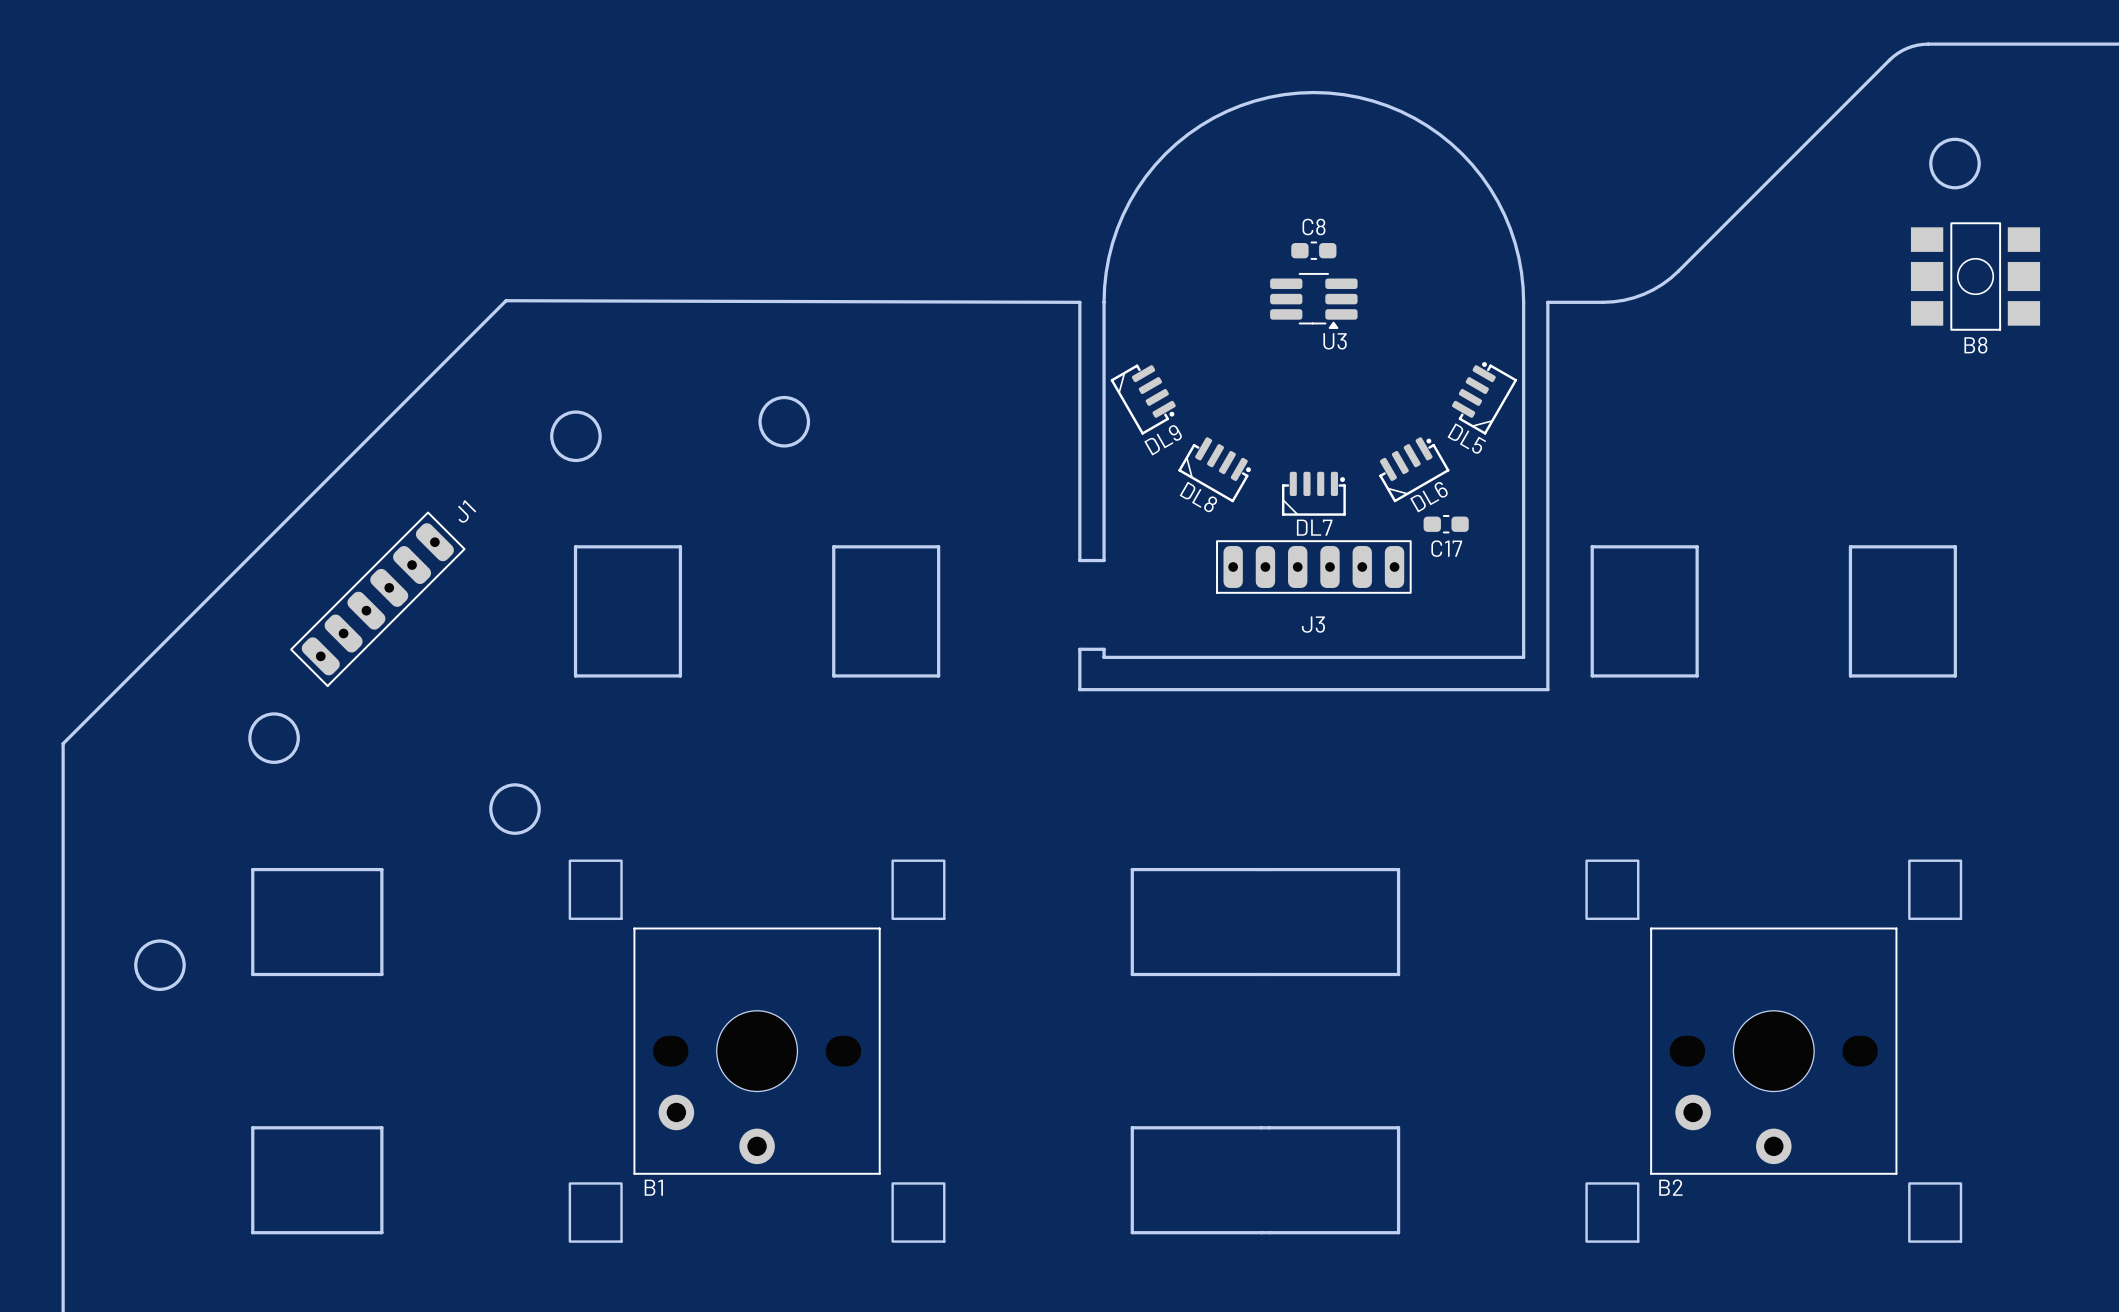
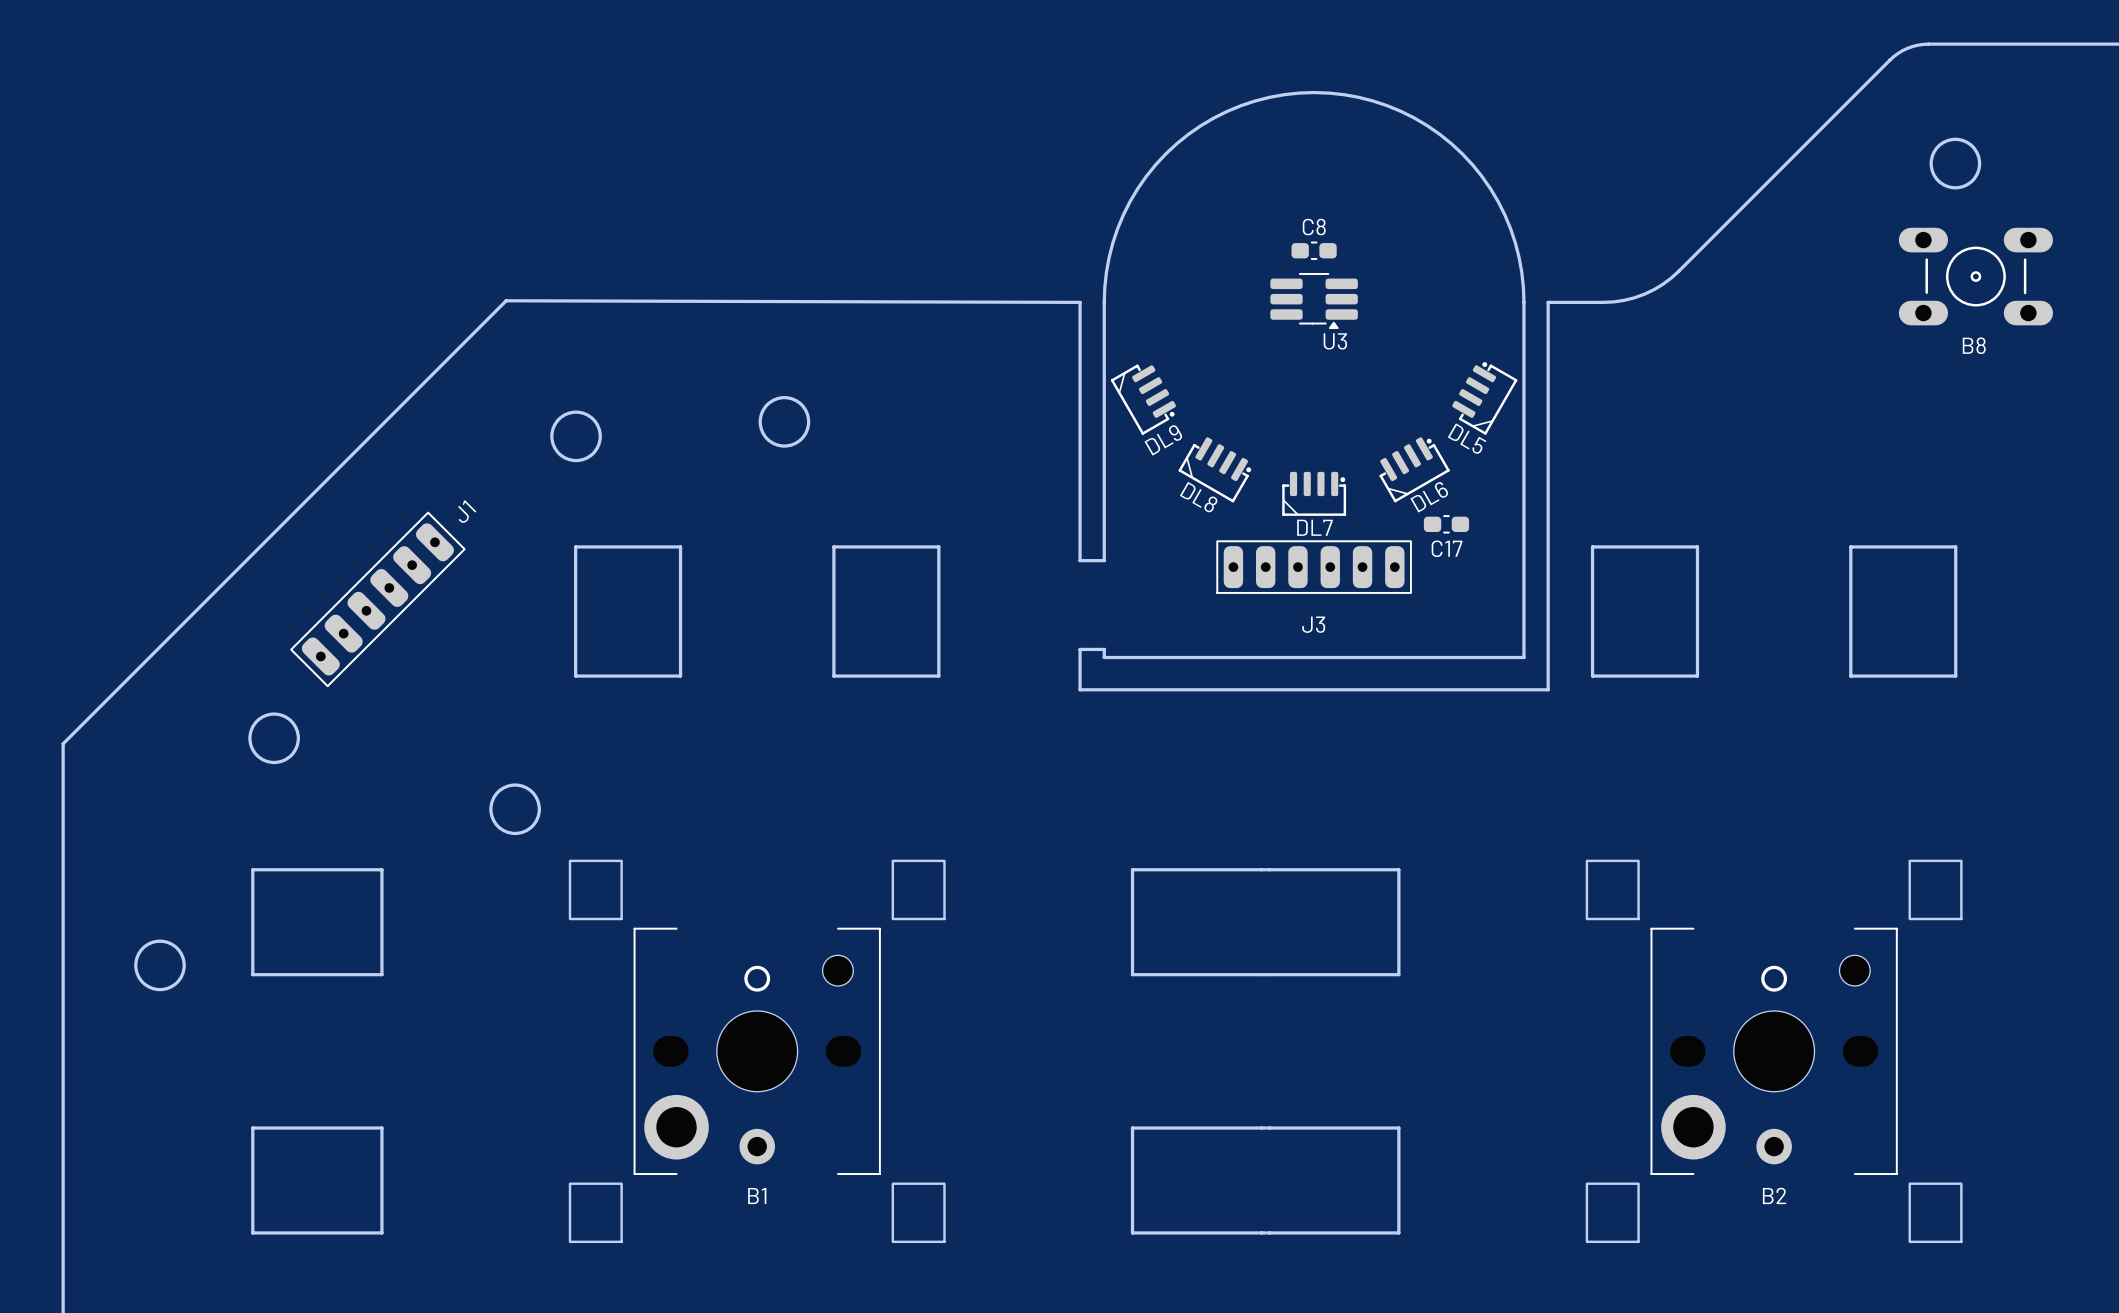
B8 footprint: [1910, 222, 2041, 331] -> [1898, 227, 2053, 326]
B1 footprint: [633, 927, 881, 1175] -> [633, 927, 881, 1175]
B2 footprint: [1650, 927, 1898, 1175] -> [1650, 927, 1898, 1175]
B1 name position: B1 (653, 1187) -> B1 (757, 1196)
B2 name position: B2 (1670, 1187) -> B2 (1774, 1195)

